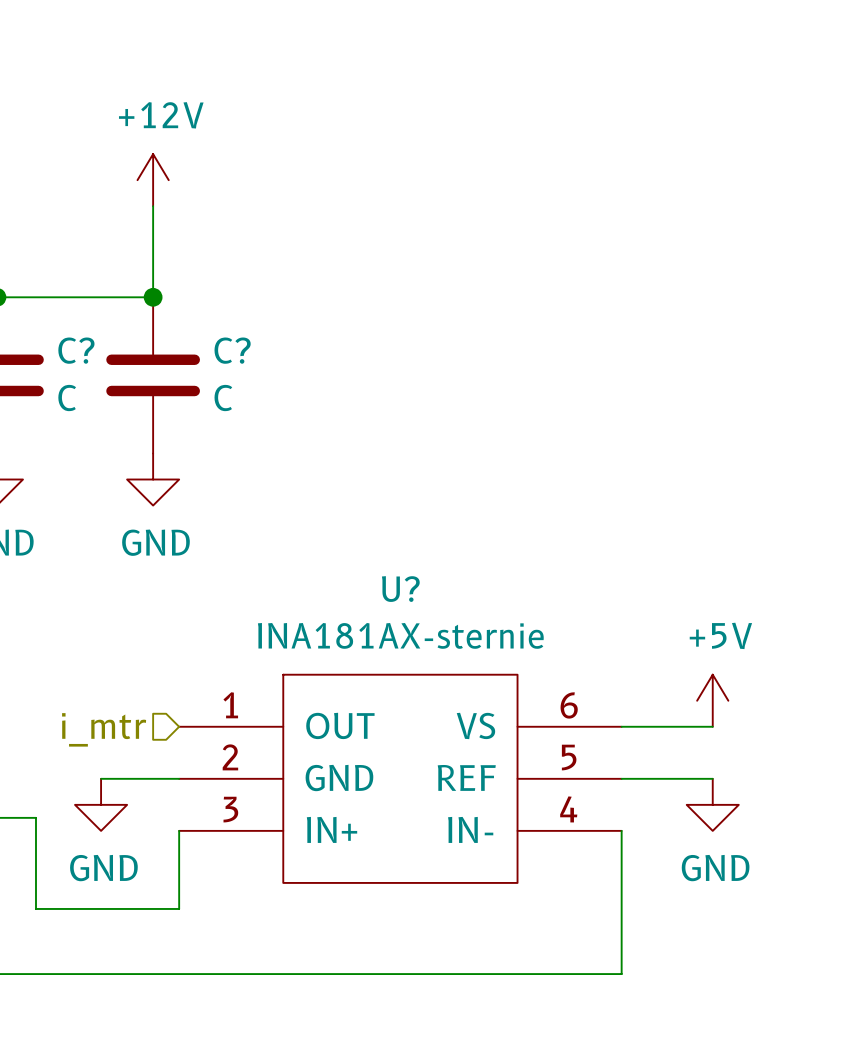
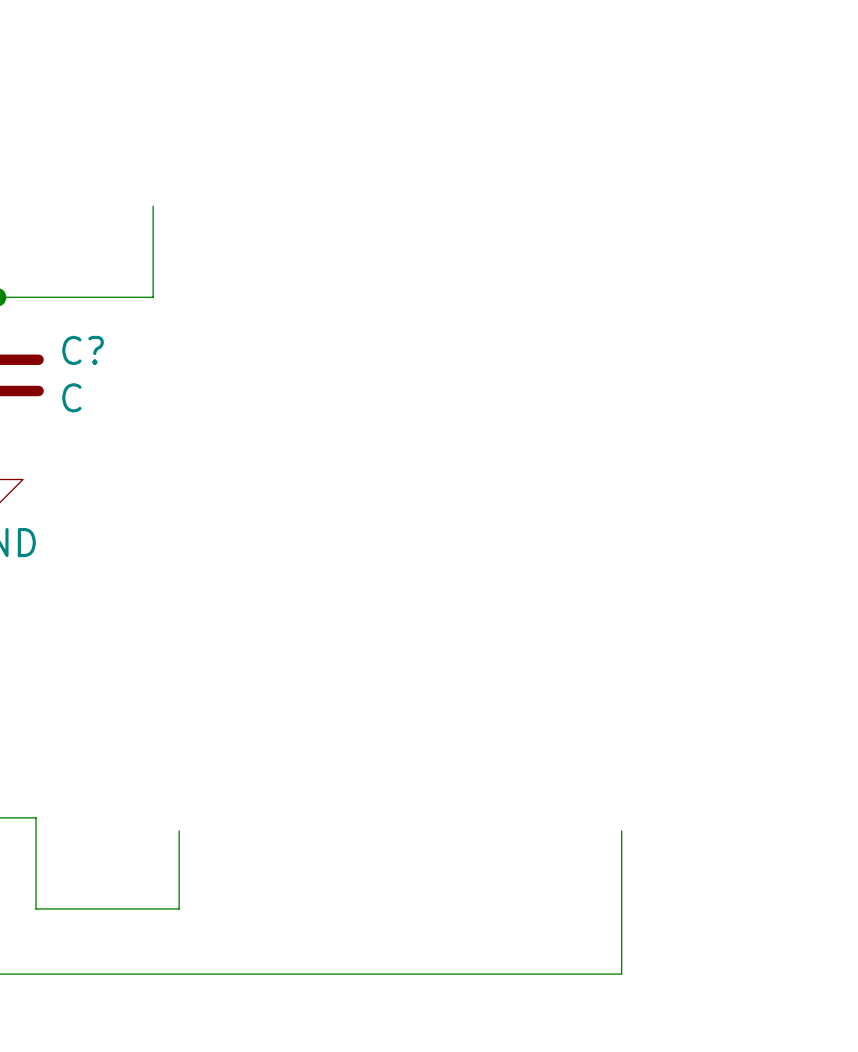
power symbol: +12V (153, 180) -> none
junction: (153, 297) -> none
C?: C (153, 375) -> none
power symbol: GND (153, 479) -> none
power symbol: +5V (712, 700) -> none
wire: (621, 726) (712, 726) -> none
hierarchical label: i_mtr (104, 729) -> none
wire: (101, 778) (179, 778) -> none
U?: INA181AX-sternie (400, 778) -> none
wire: (621, 778) (712, 778) -> none
power symbol: GND (101, 804) -> none
power symbol: GND (712, 804) -> none

